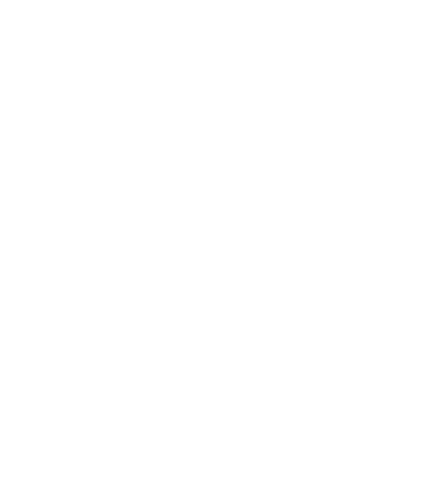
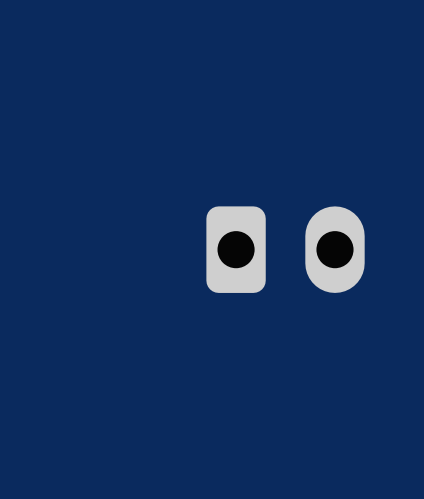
part: none -> (285, 249)

